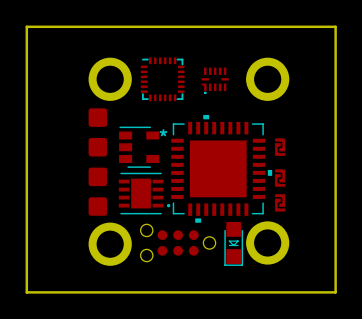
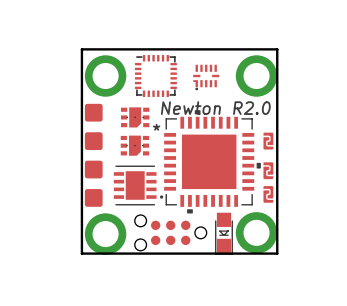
board edge: (26, 26) (335, 26) (335, 292) (26, 292) (26, 26) -> (81, 49) (81, 253) (277, 253) (277, 49) (81, 49)
text: none -> Newton R2.0 (215, 108)
part: none -> (135, 117)
part footprint: [119, 126, 160, 168] -> [120, 135, 150, 156]

